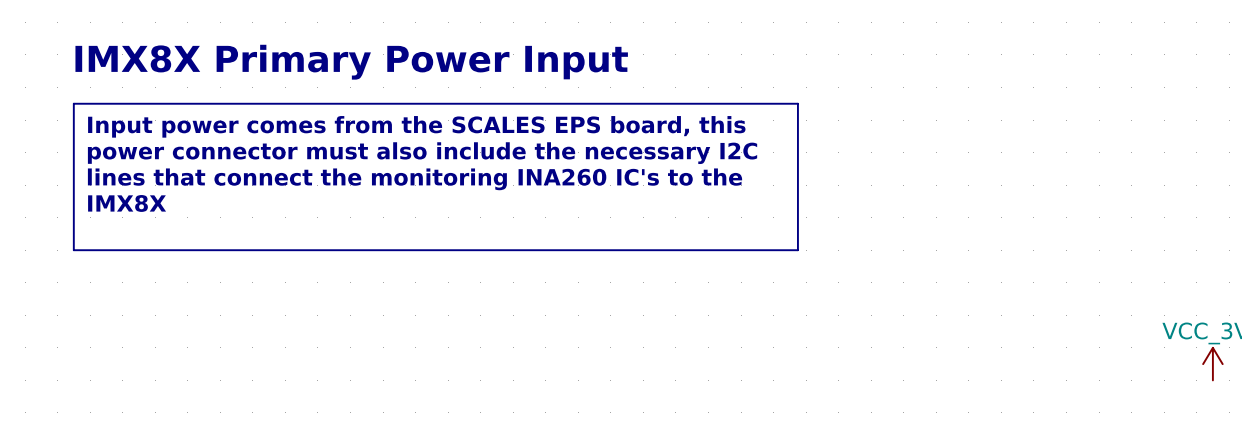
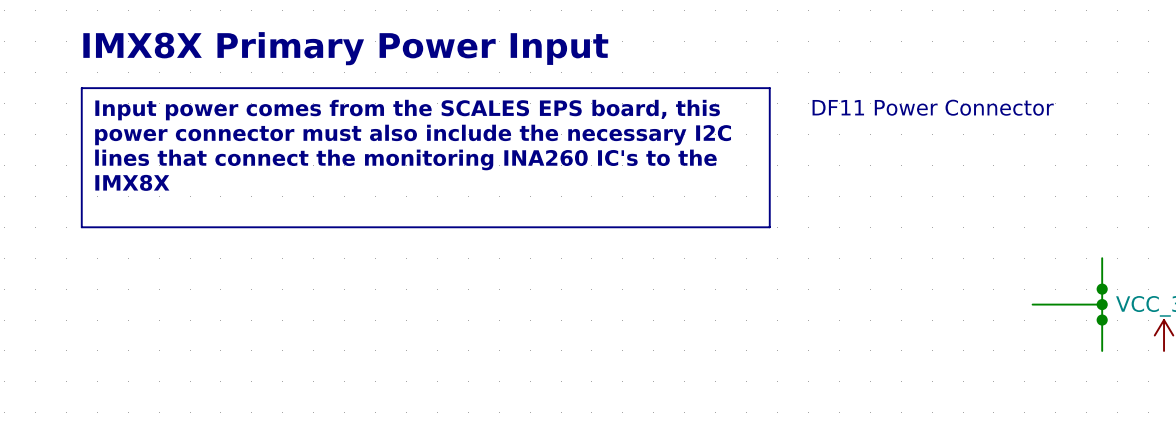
text: none -> DF11 Power Connector (933, 107)
wire: none -> (1102, 258) (1102, 350)
junction: none -> (1102, 289)
wire: none -> (1032, 304) (1102, 304)
junction: none -> (1102, 304)
junction: none -> (1102, 320)

